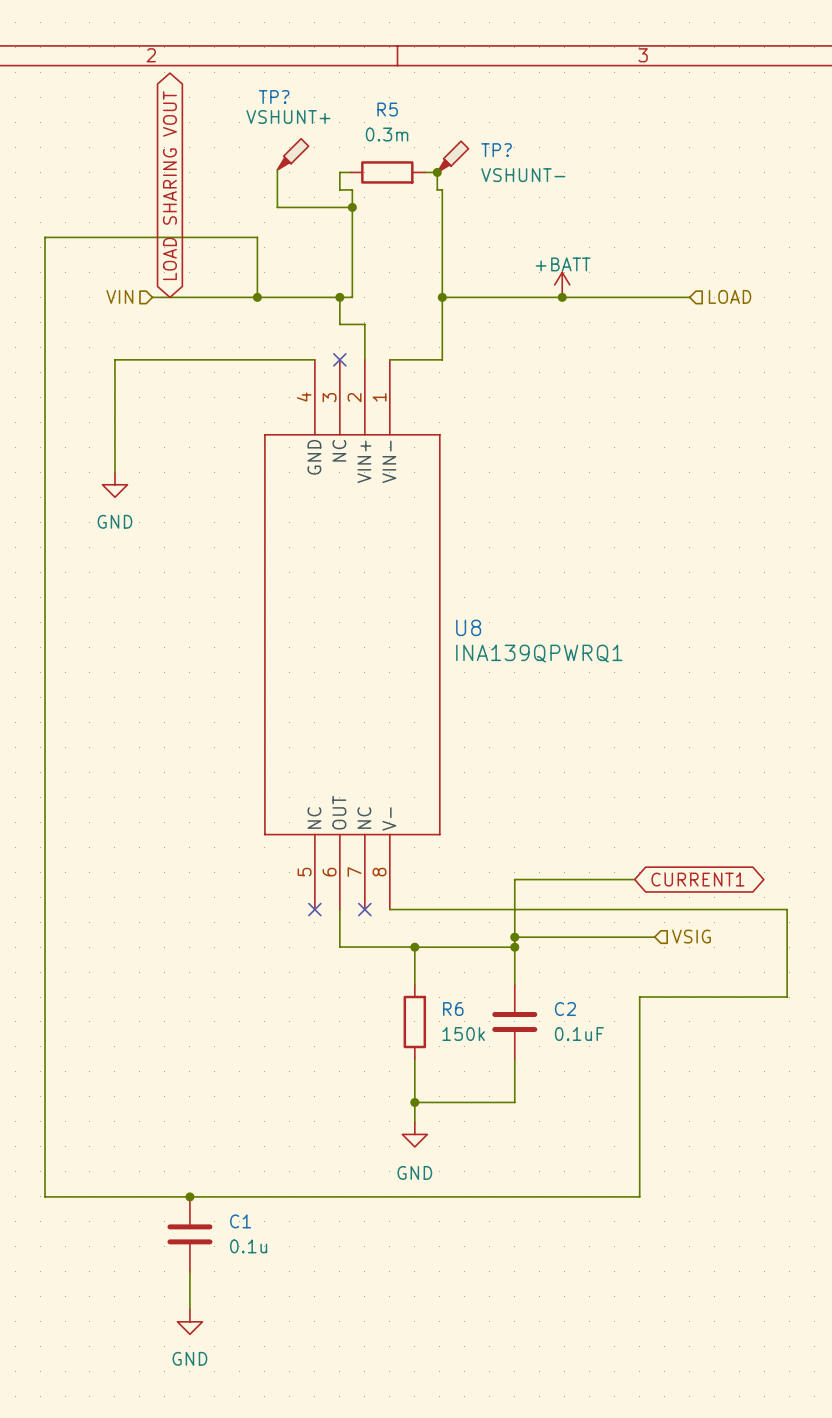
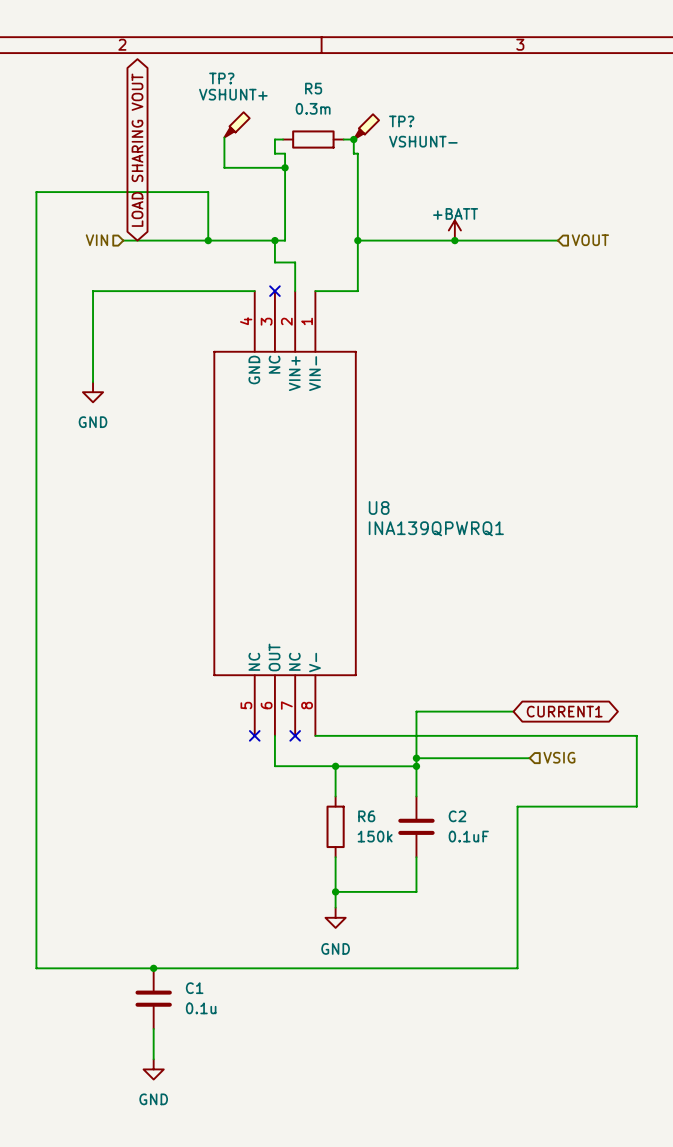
hierarchical label: LOAD (730, 296) -> VOUT (590, 240)

